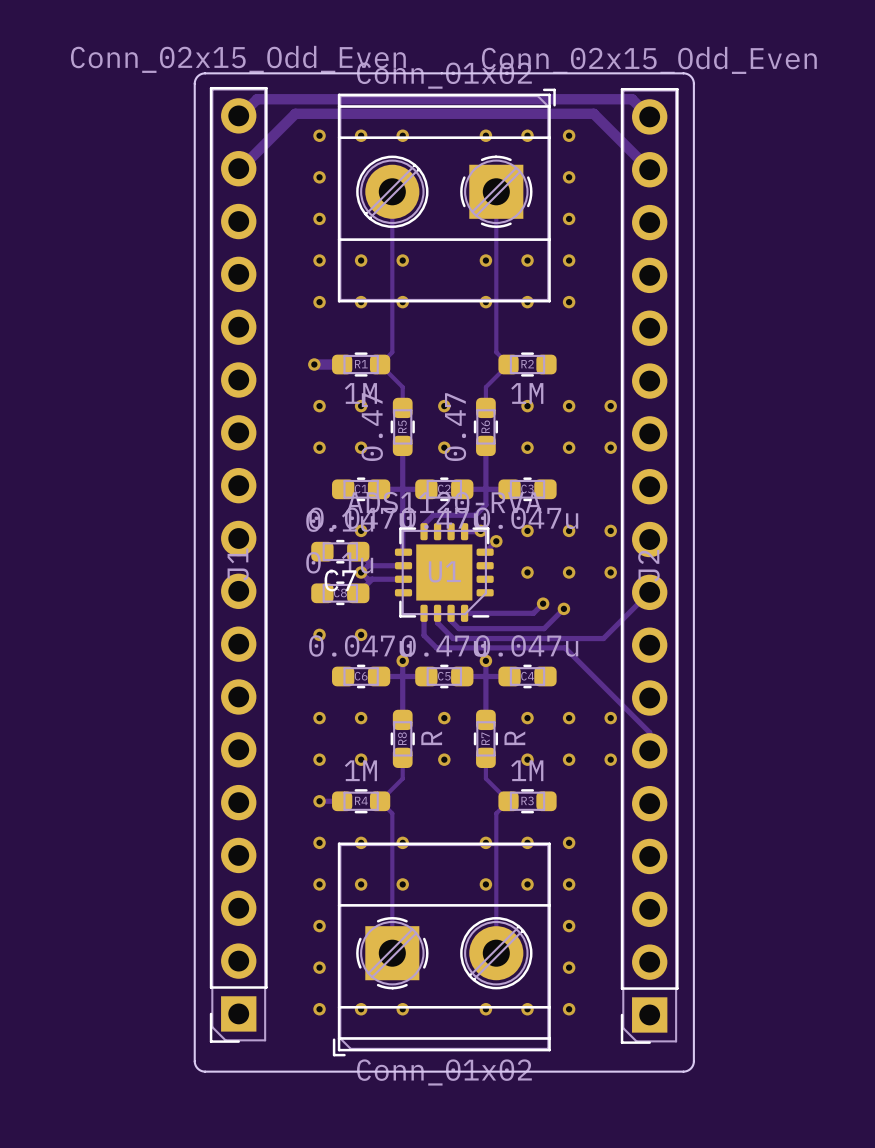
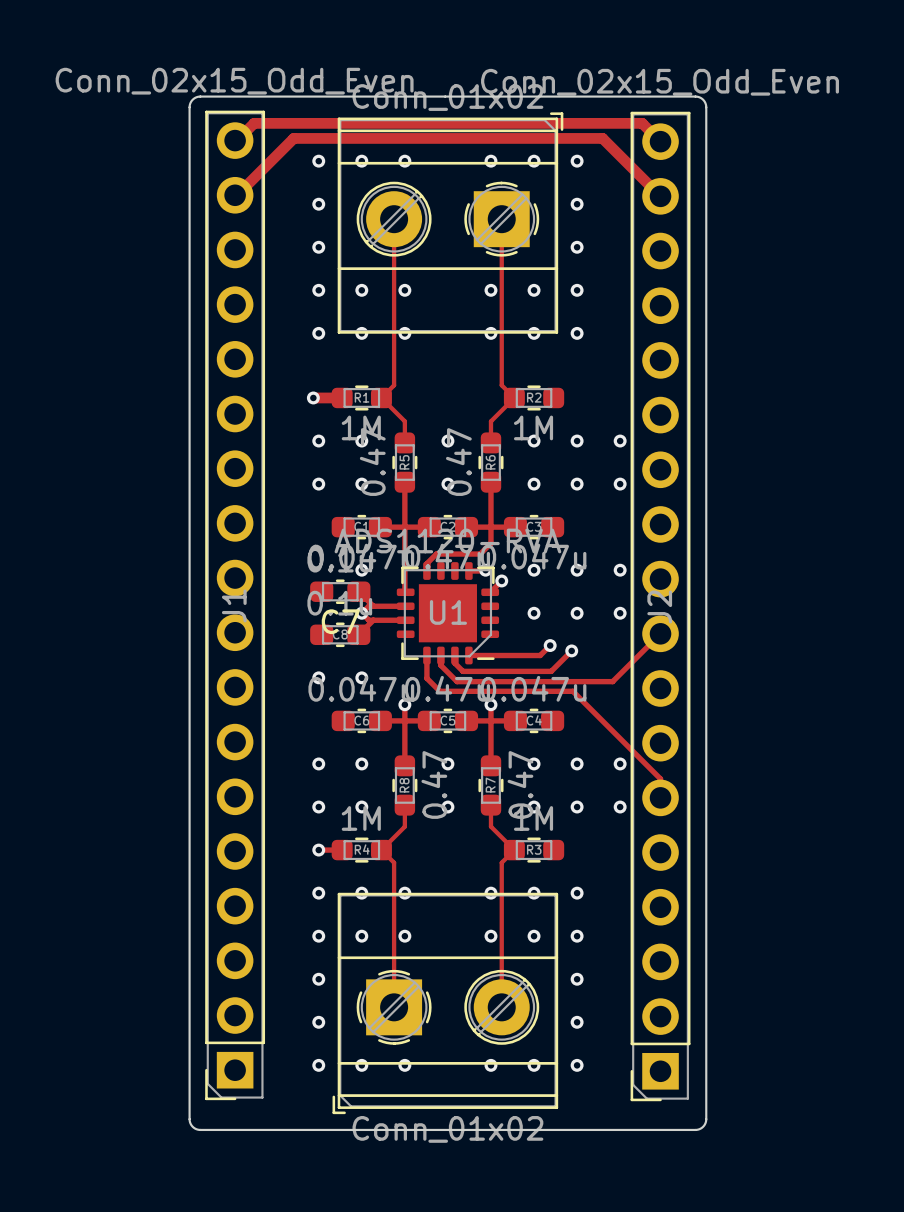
R8 value: R (431, 738) -> 0.47 (434, 784)
R7 value: R (514, 738) -> 0.47 (520, 784)

